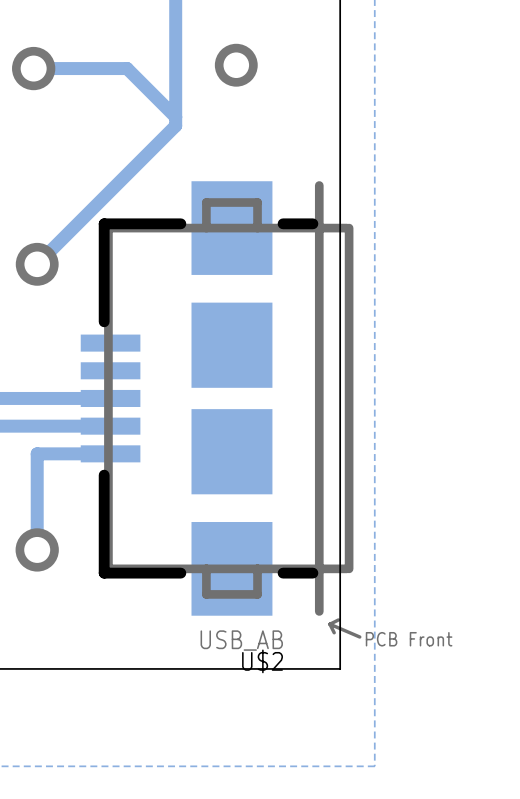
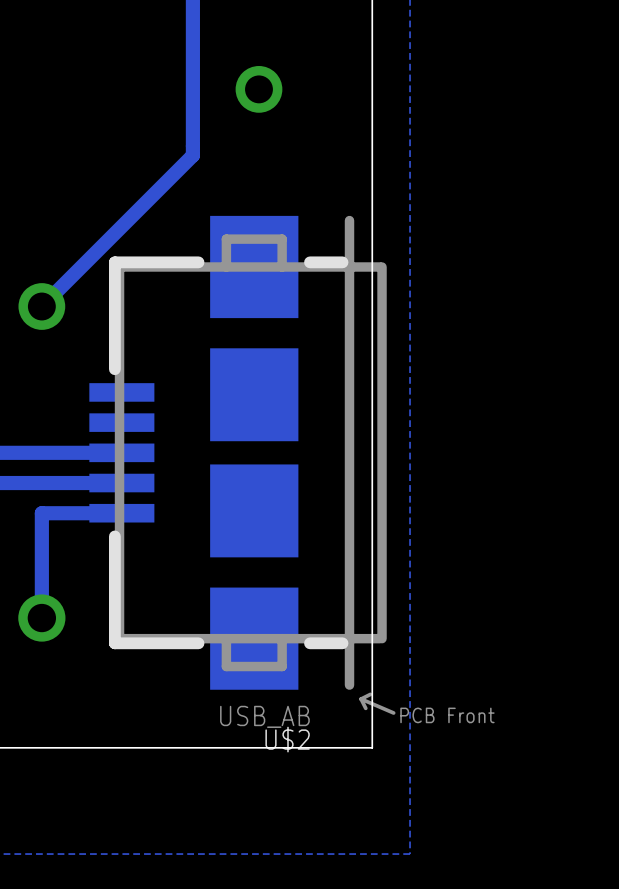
track: (33, 68) (127, 68) (175, 117) -> none
via: (33, 68) -> none

